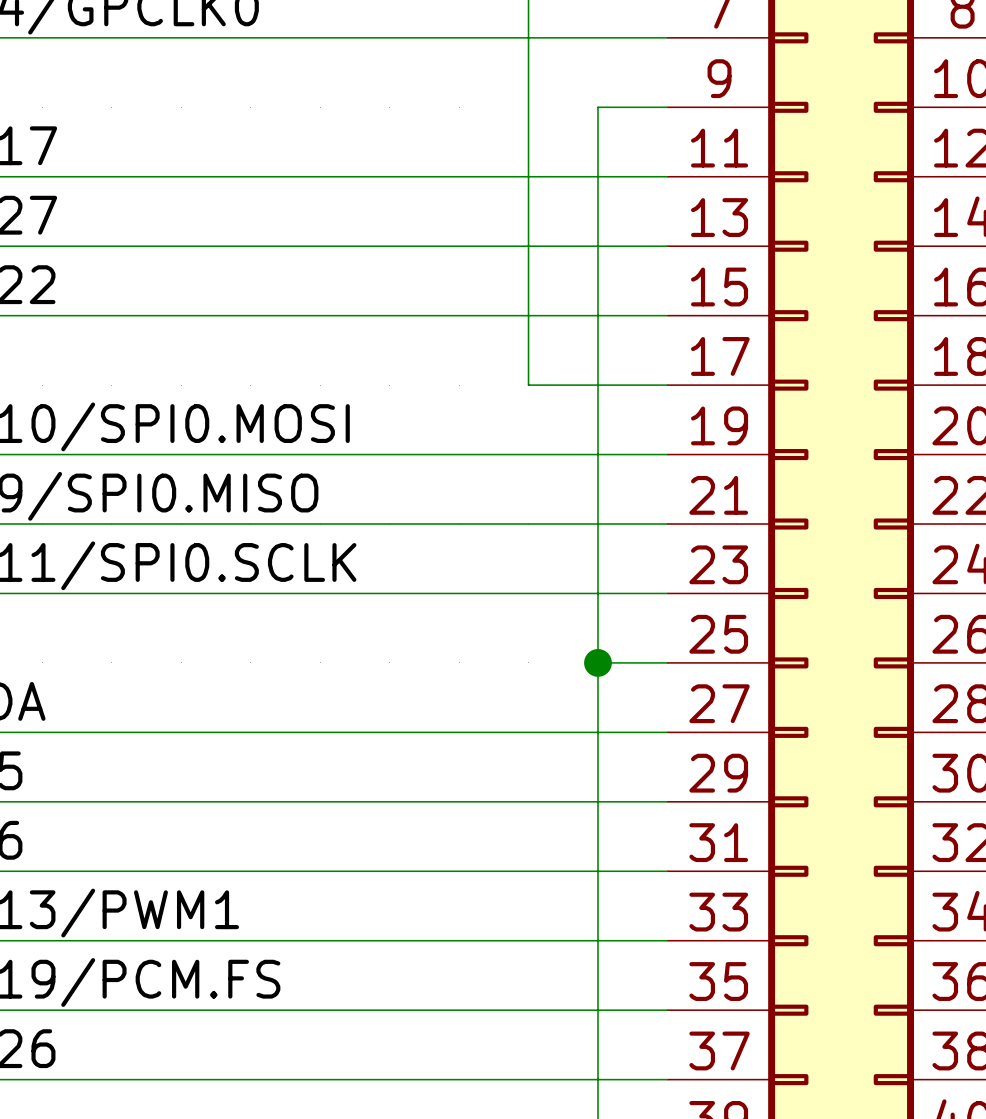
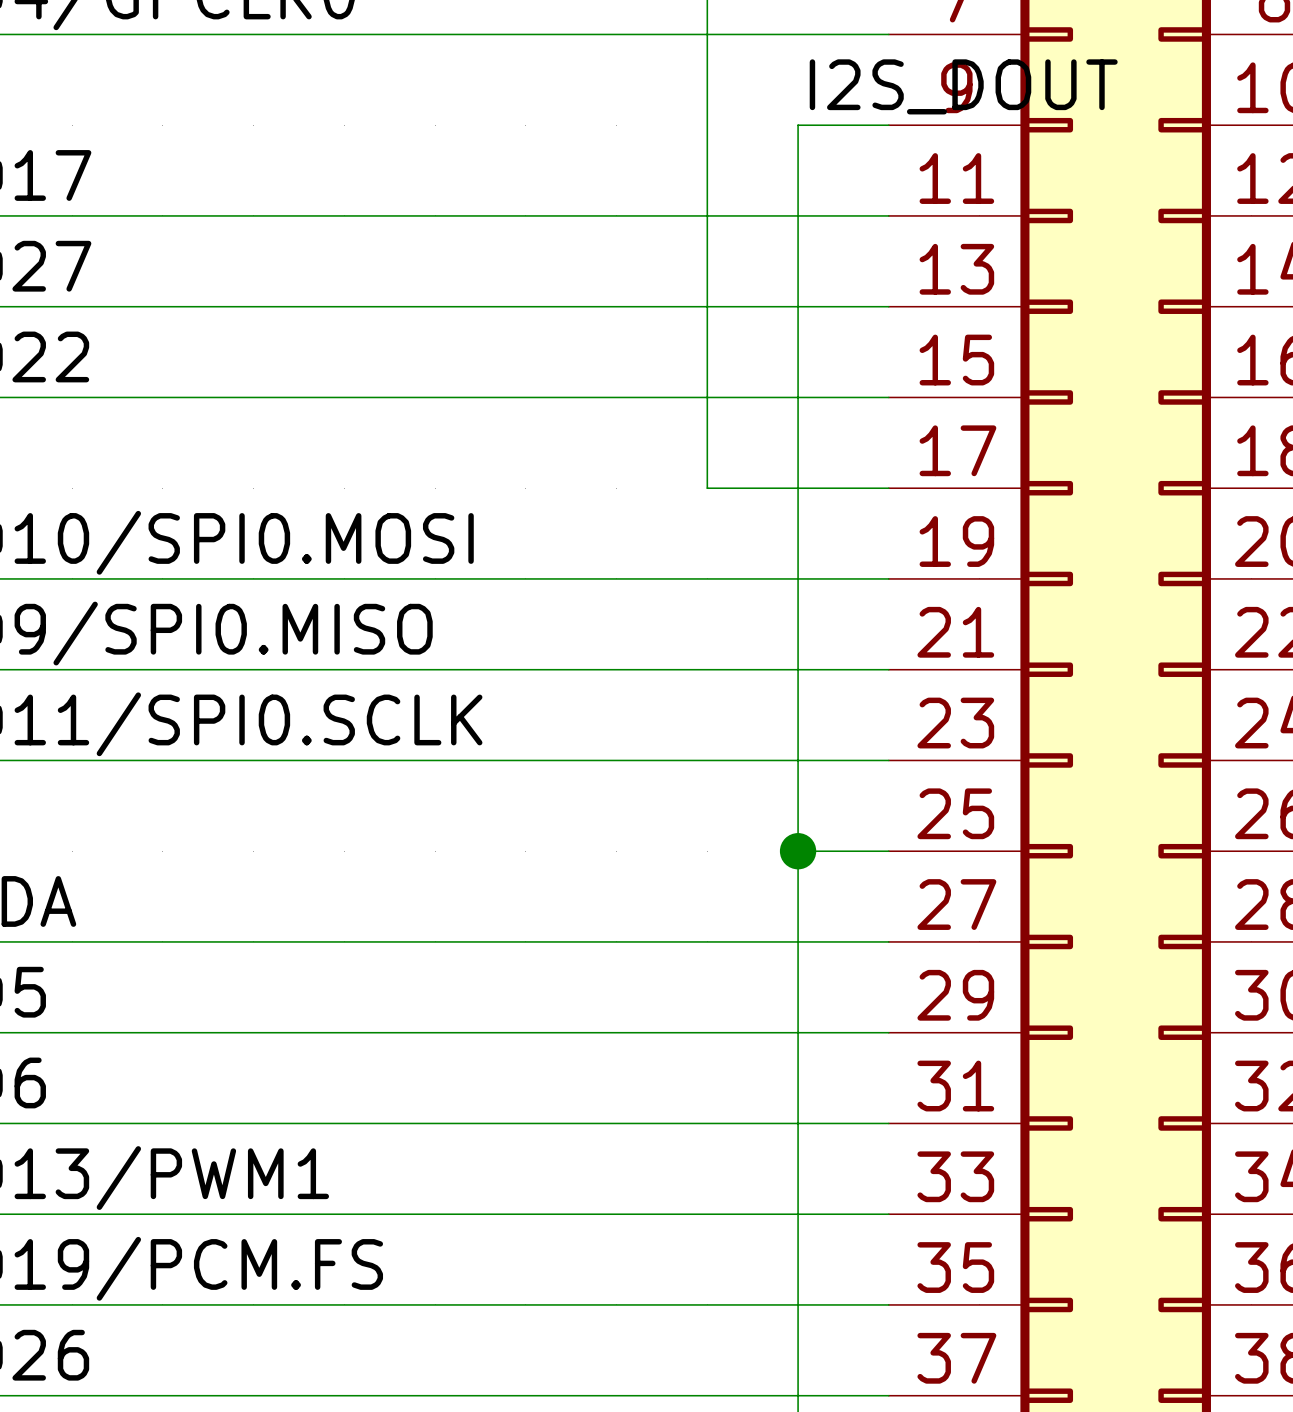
label: none -> I2S_DOUT (963, 86)

